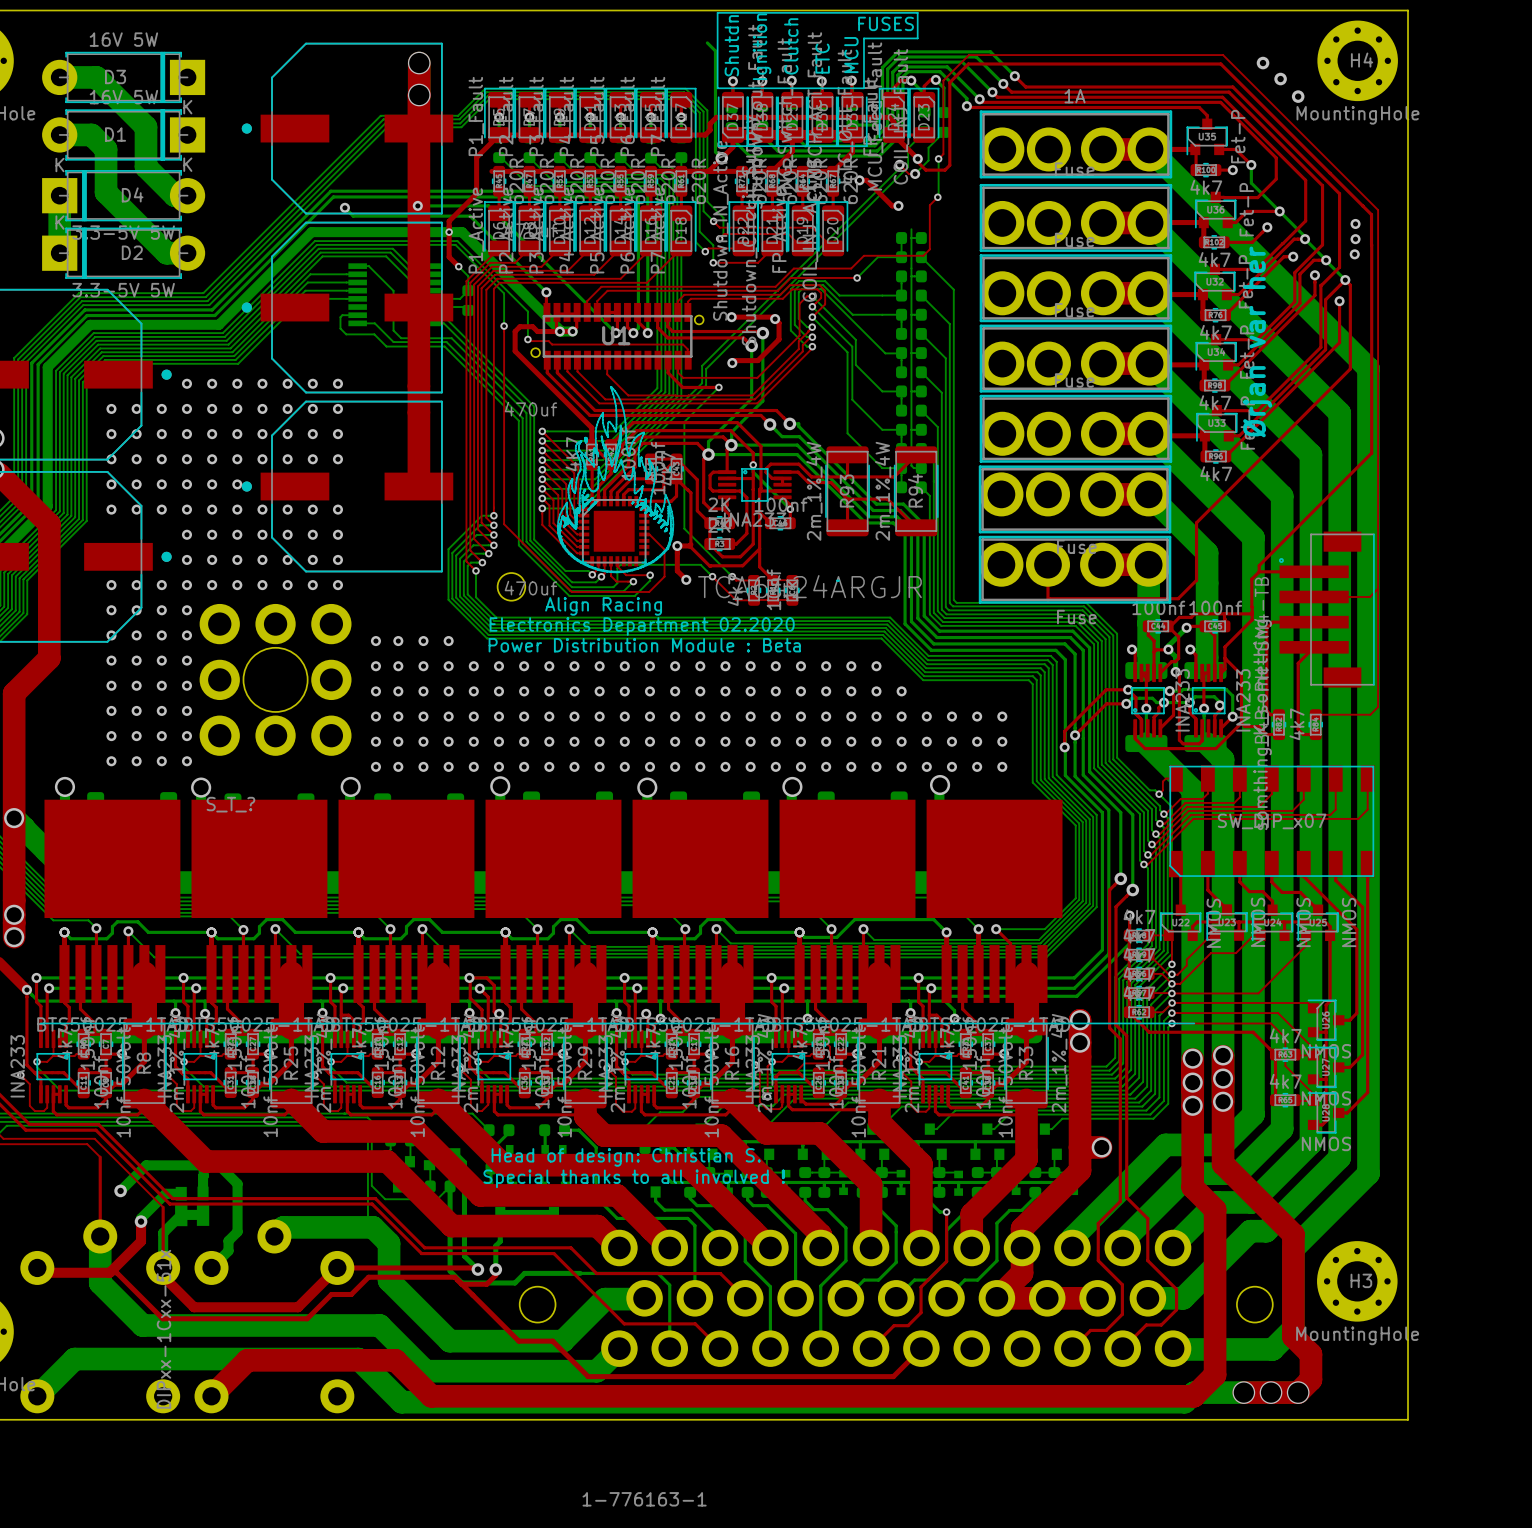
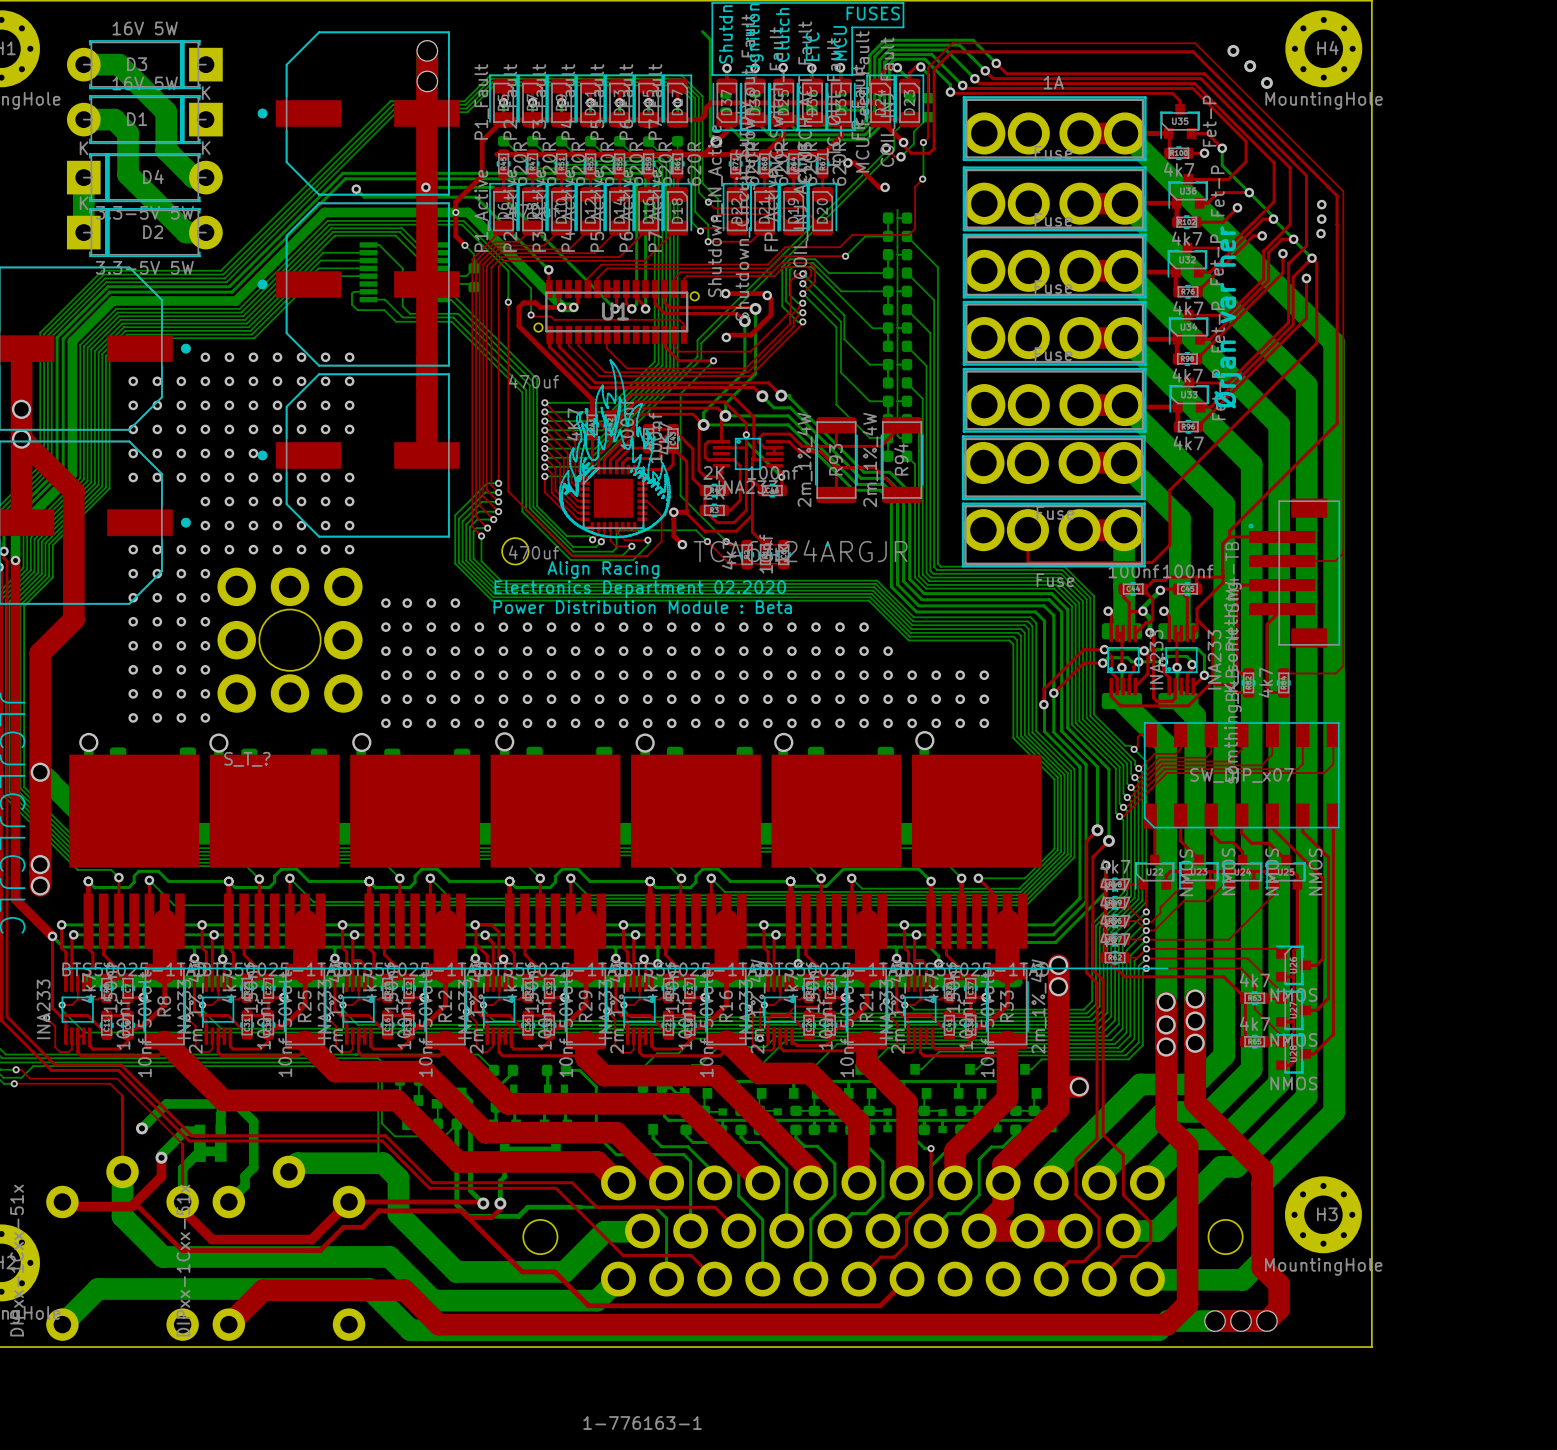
text: Head of design: Christian S. (626, 1157) -> none
text: Special thanks to all involved ! (634, 1178) -> none

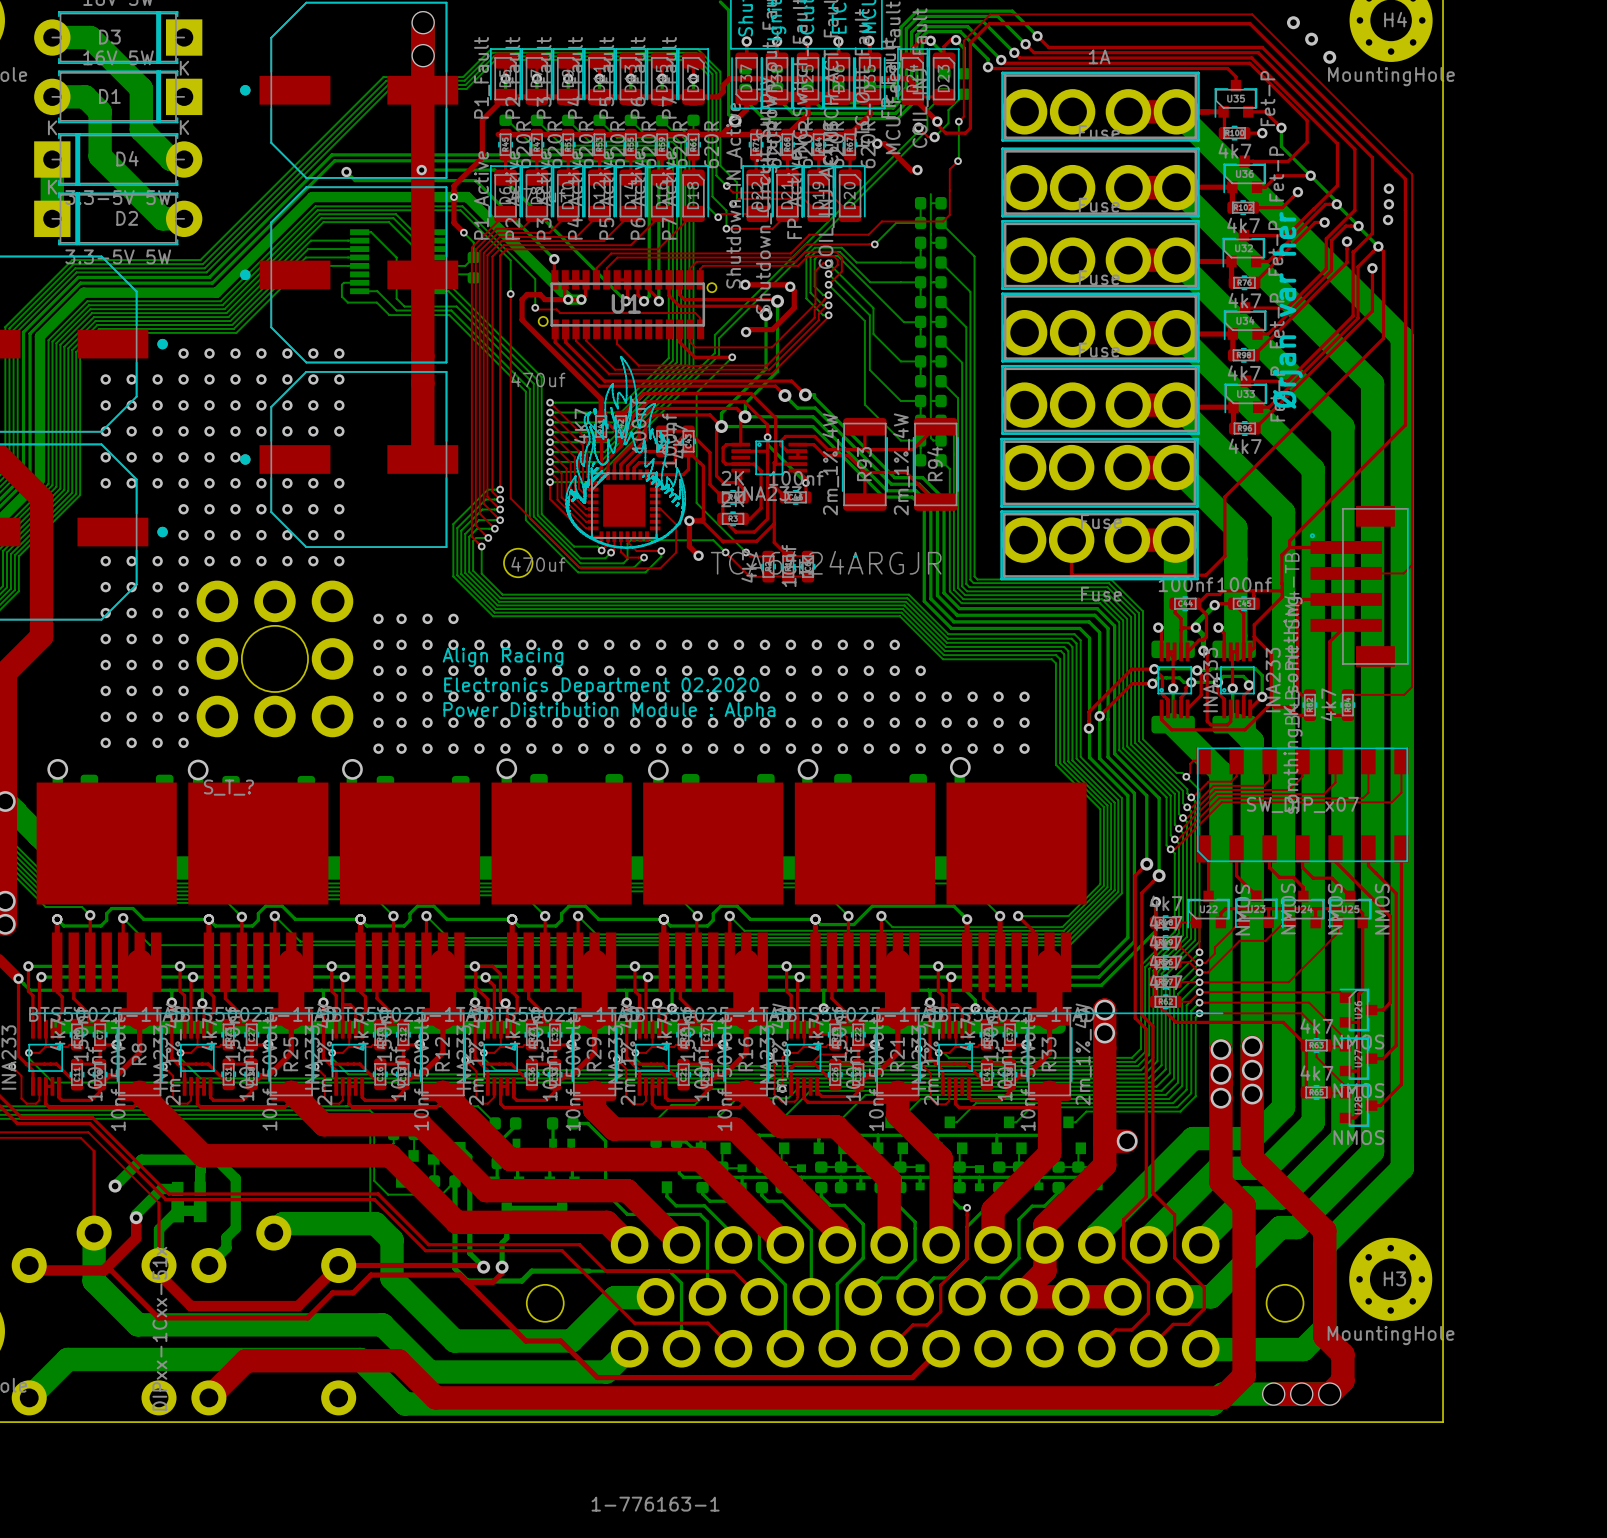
text position: Align Racing (603, 569) -> Align Racing (503, 657)
text position: Electronics Department 02.2020 (640, 589) -> Electronics Department 02.2020 (601, 686)
text: Power Distribution Module : Beta (642, 607) -> none
text: none -> Power Distribution Module : Alpha (609, 711)

